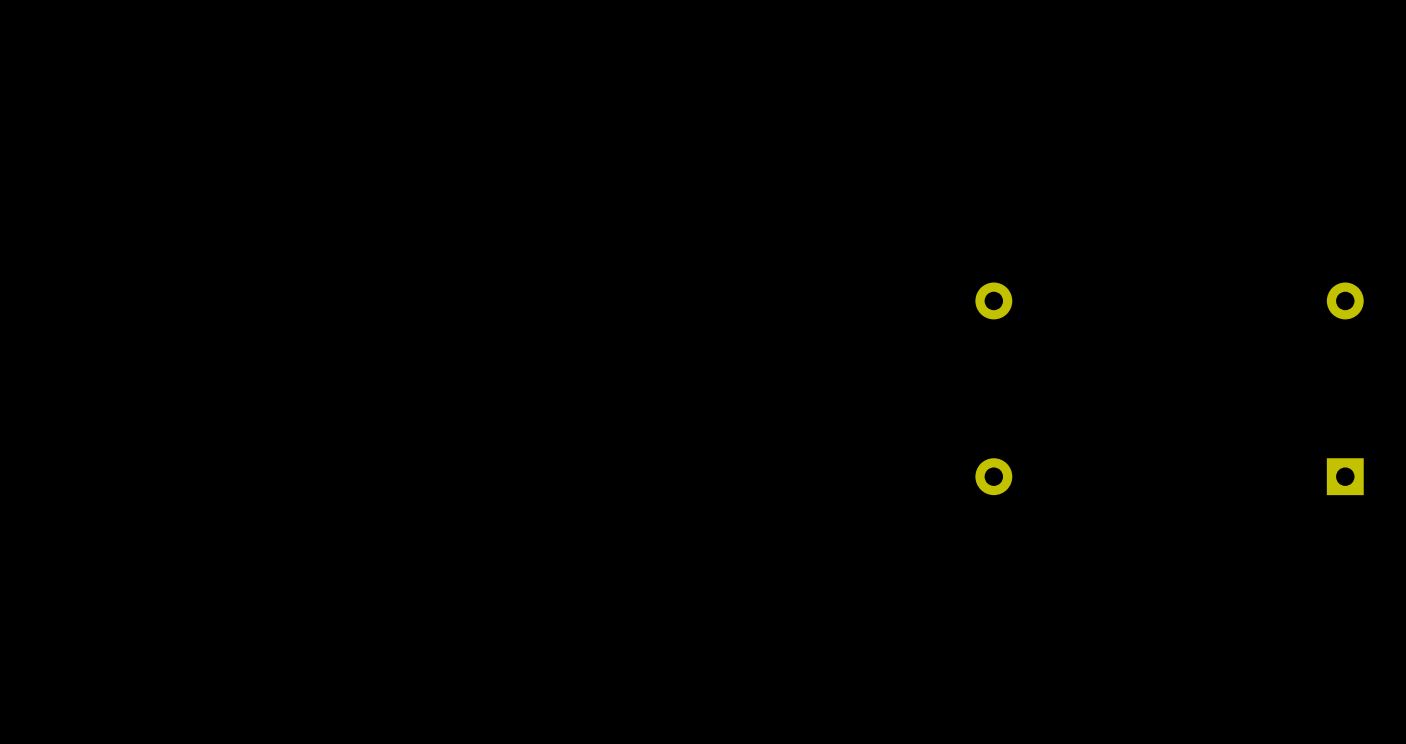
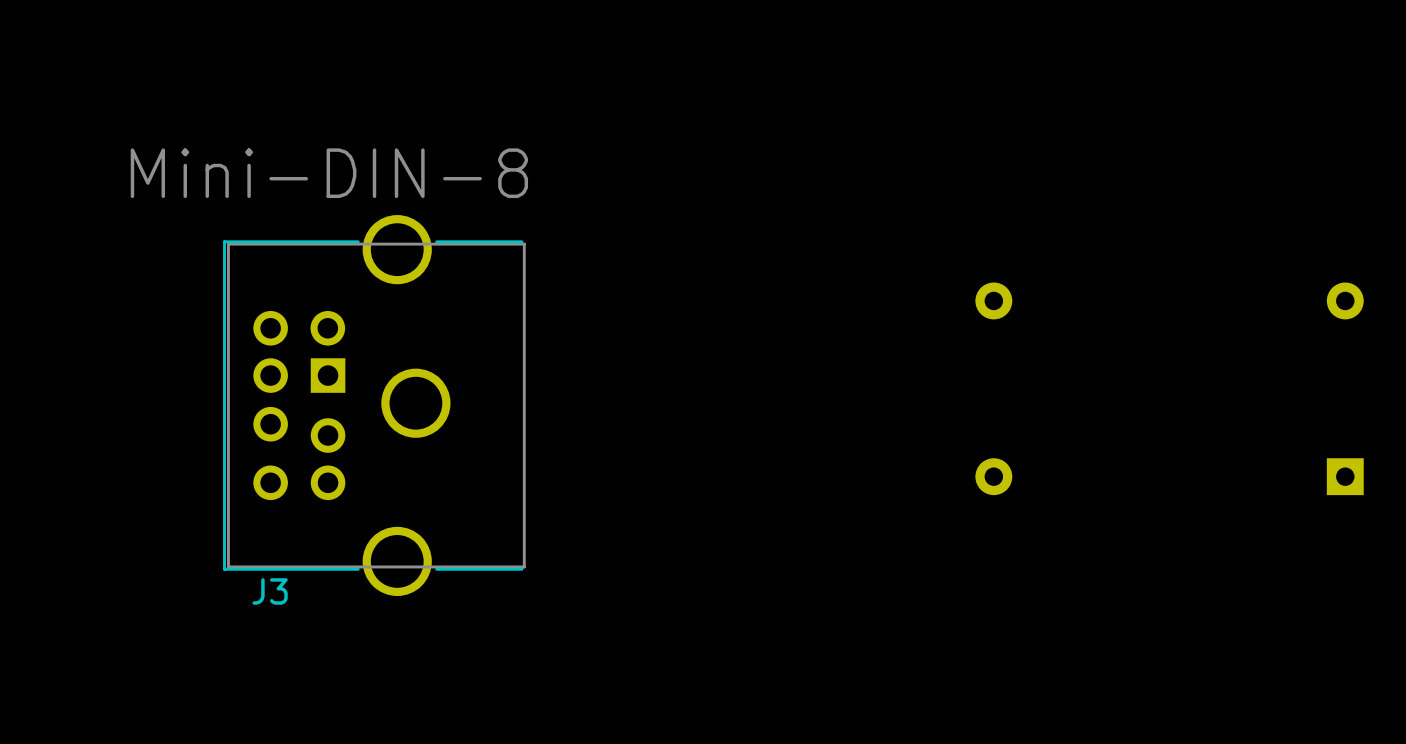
J3: none -> Mini-DIN-8 (374, 405)

